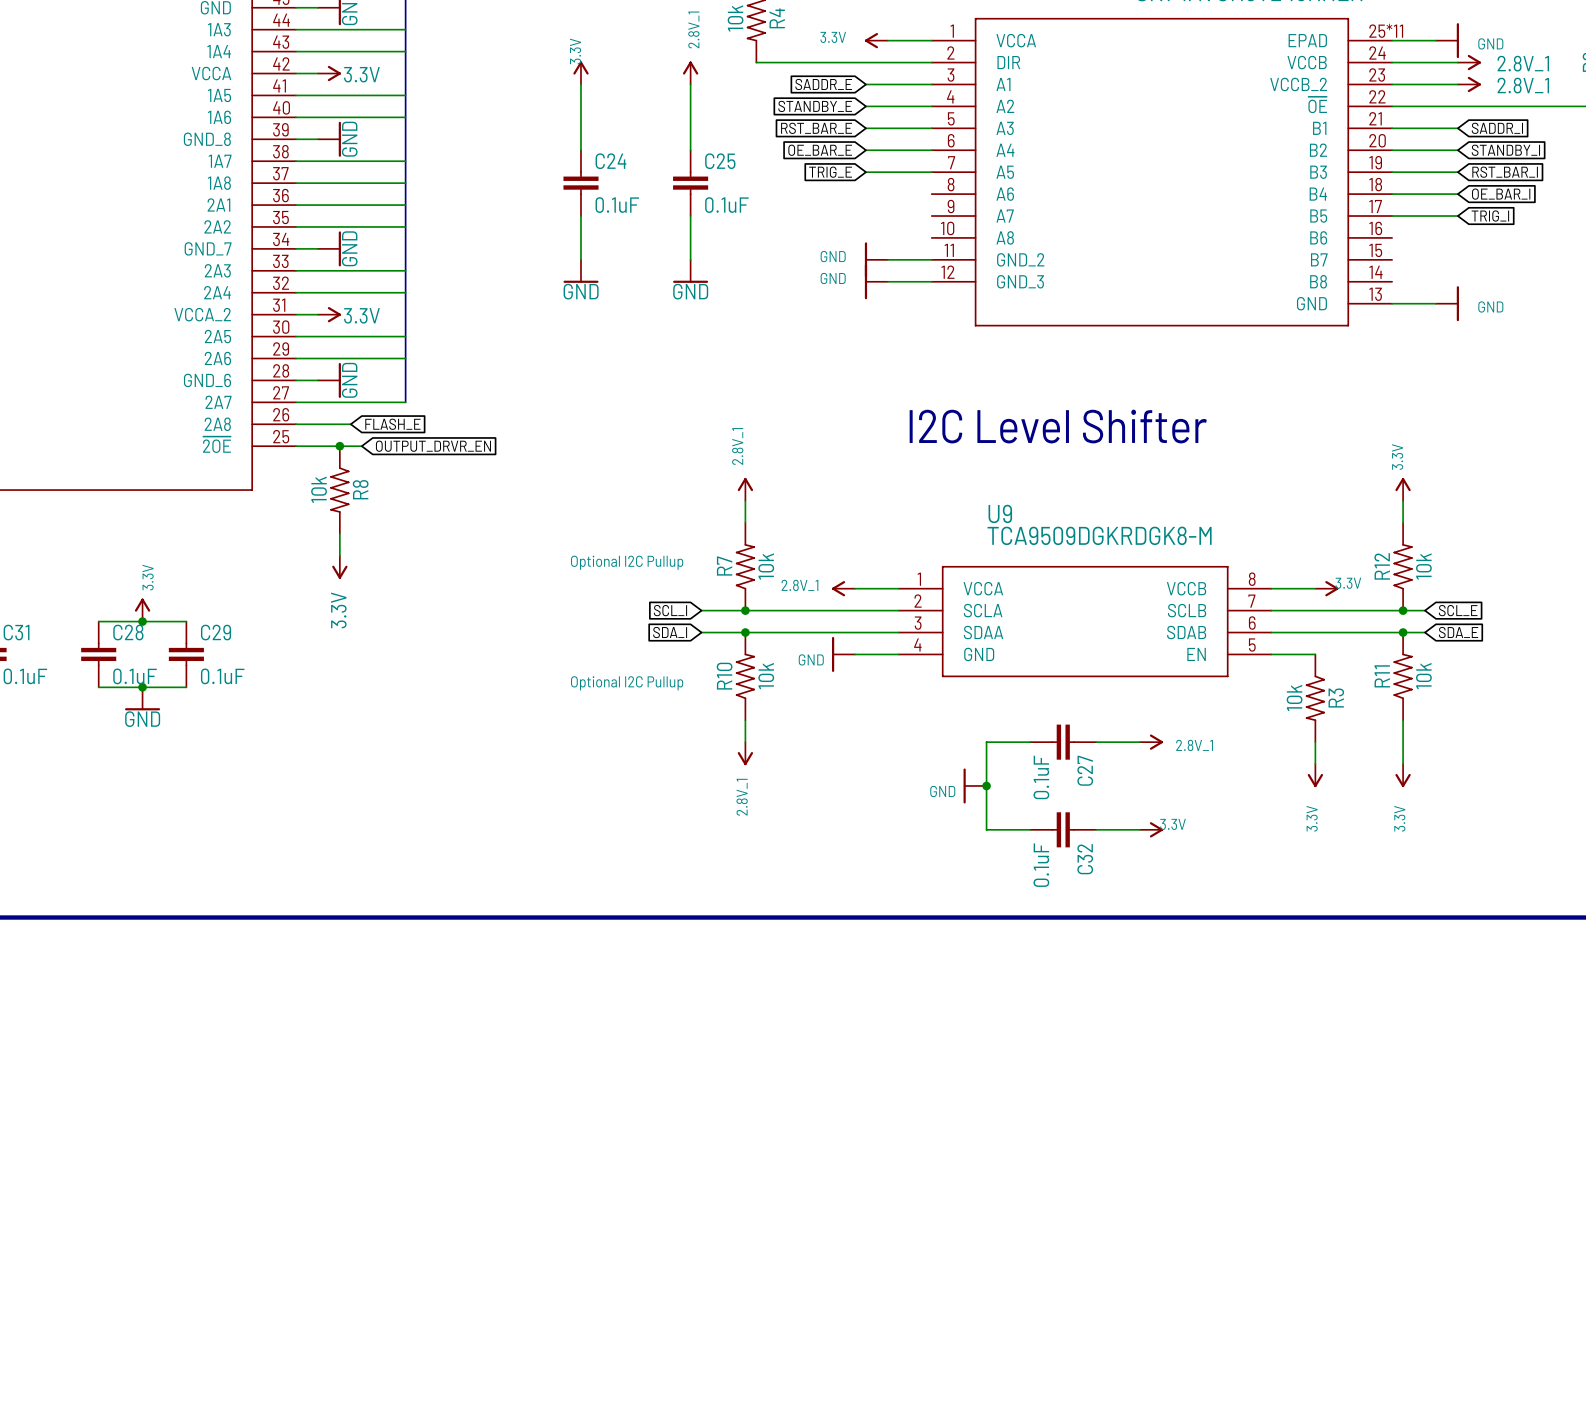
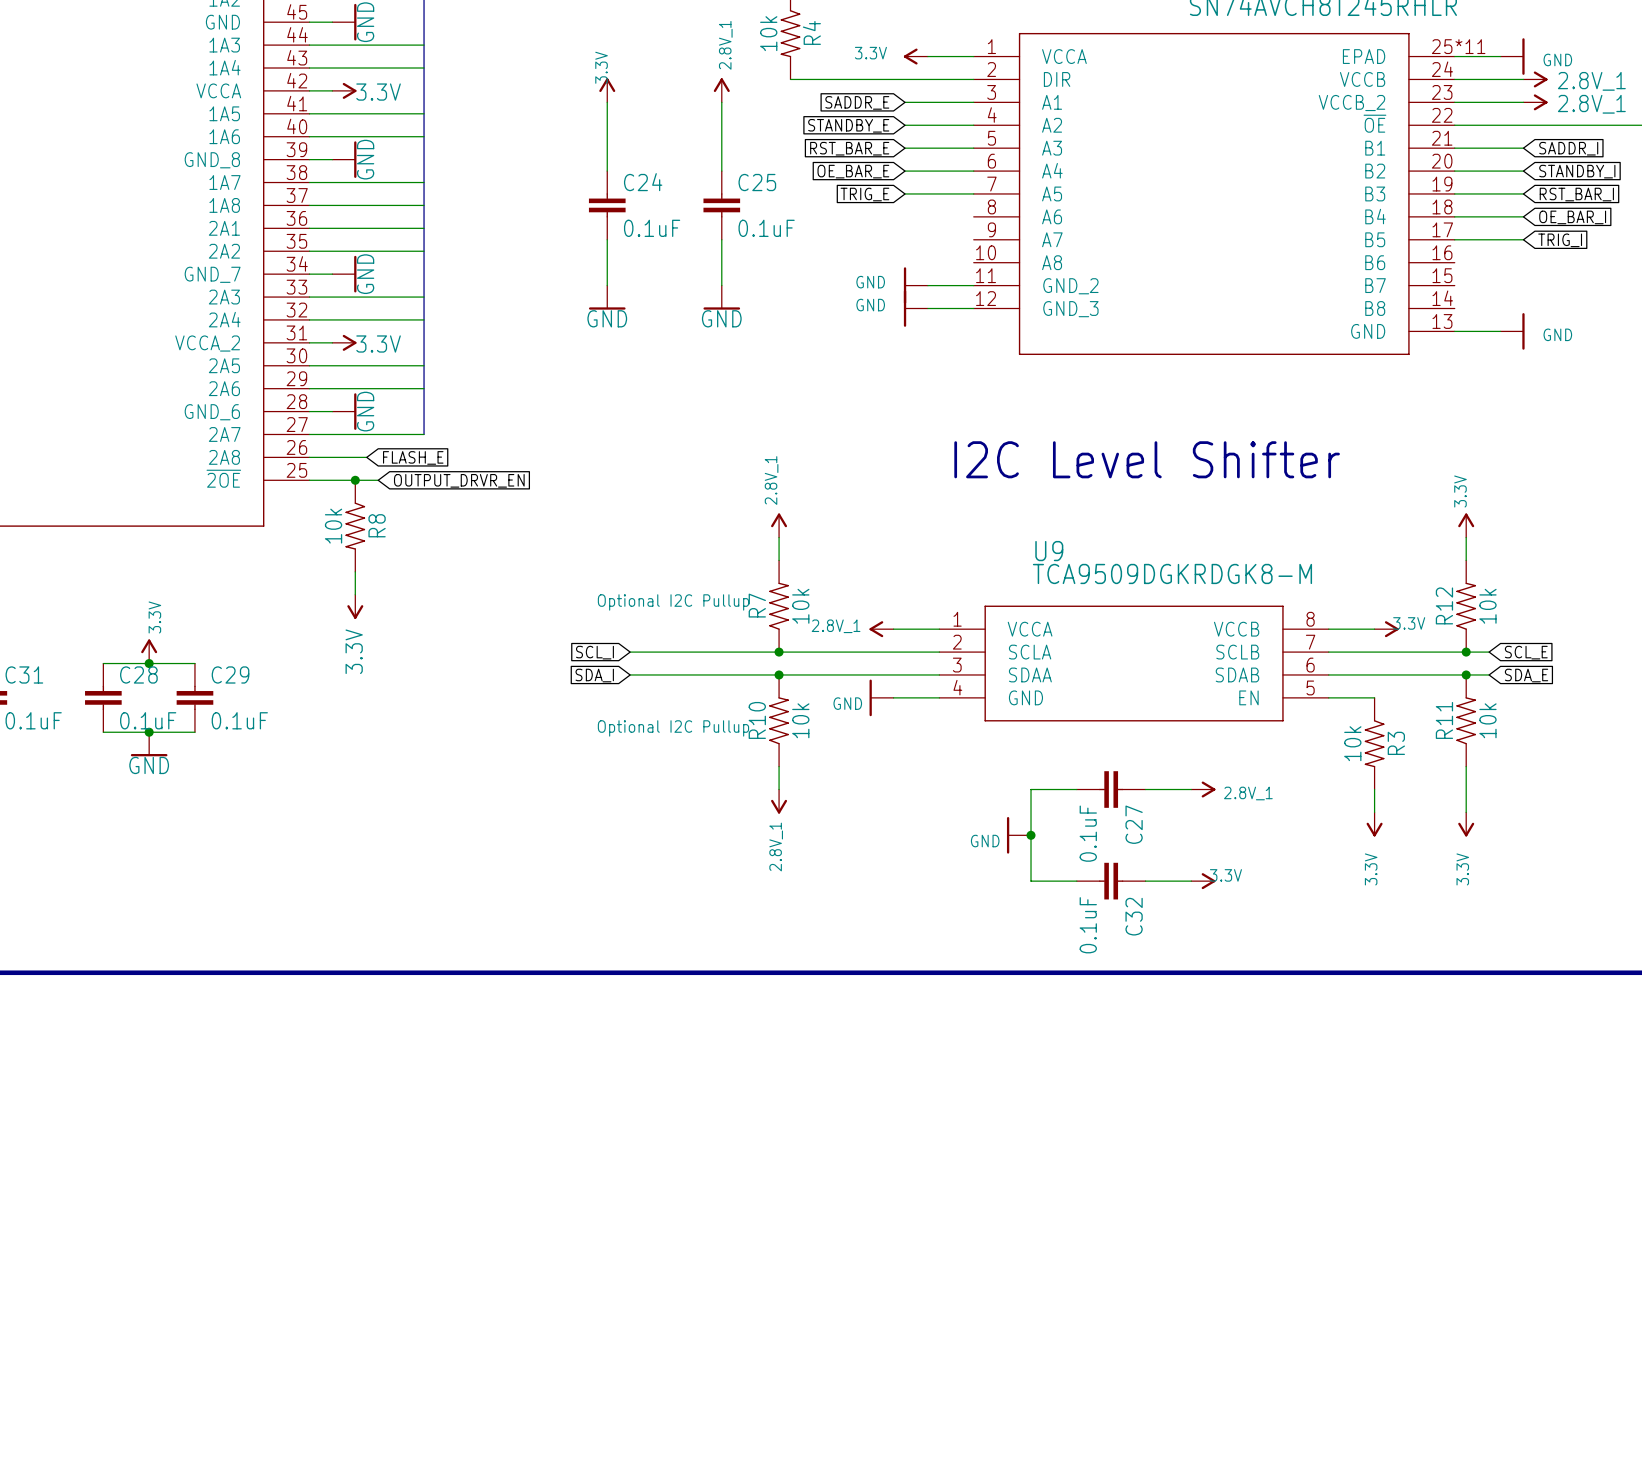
wire: none -> (630, 652) (733, 652)
global label position: SCL_I (670, 610) -> SCL_I (594, 652)
wire: none -> (630, 674) (733, 674)
global label position: SDA_I (670, 632) -> SDA_I (594, 675)

